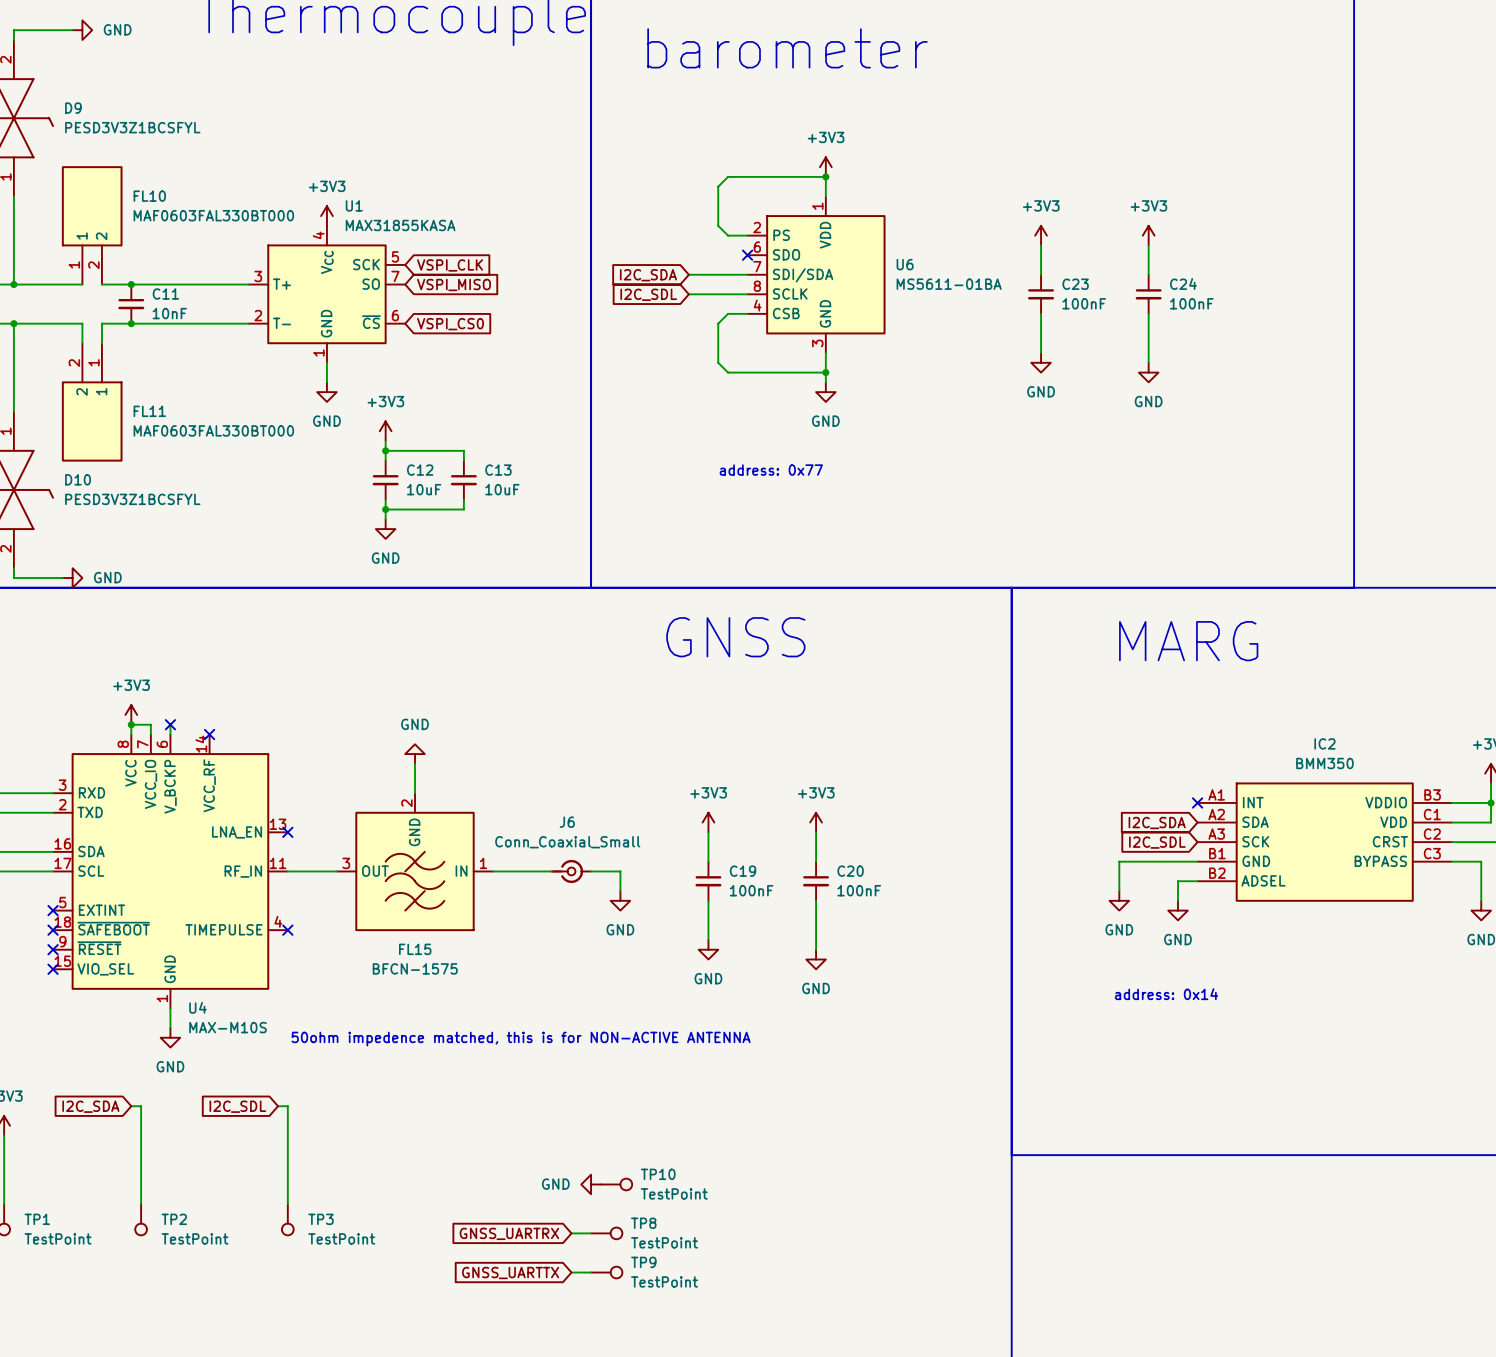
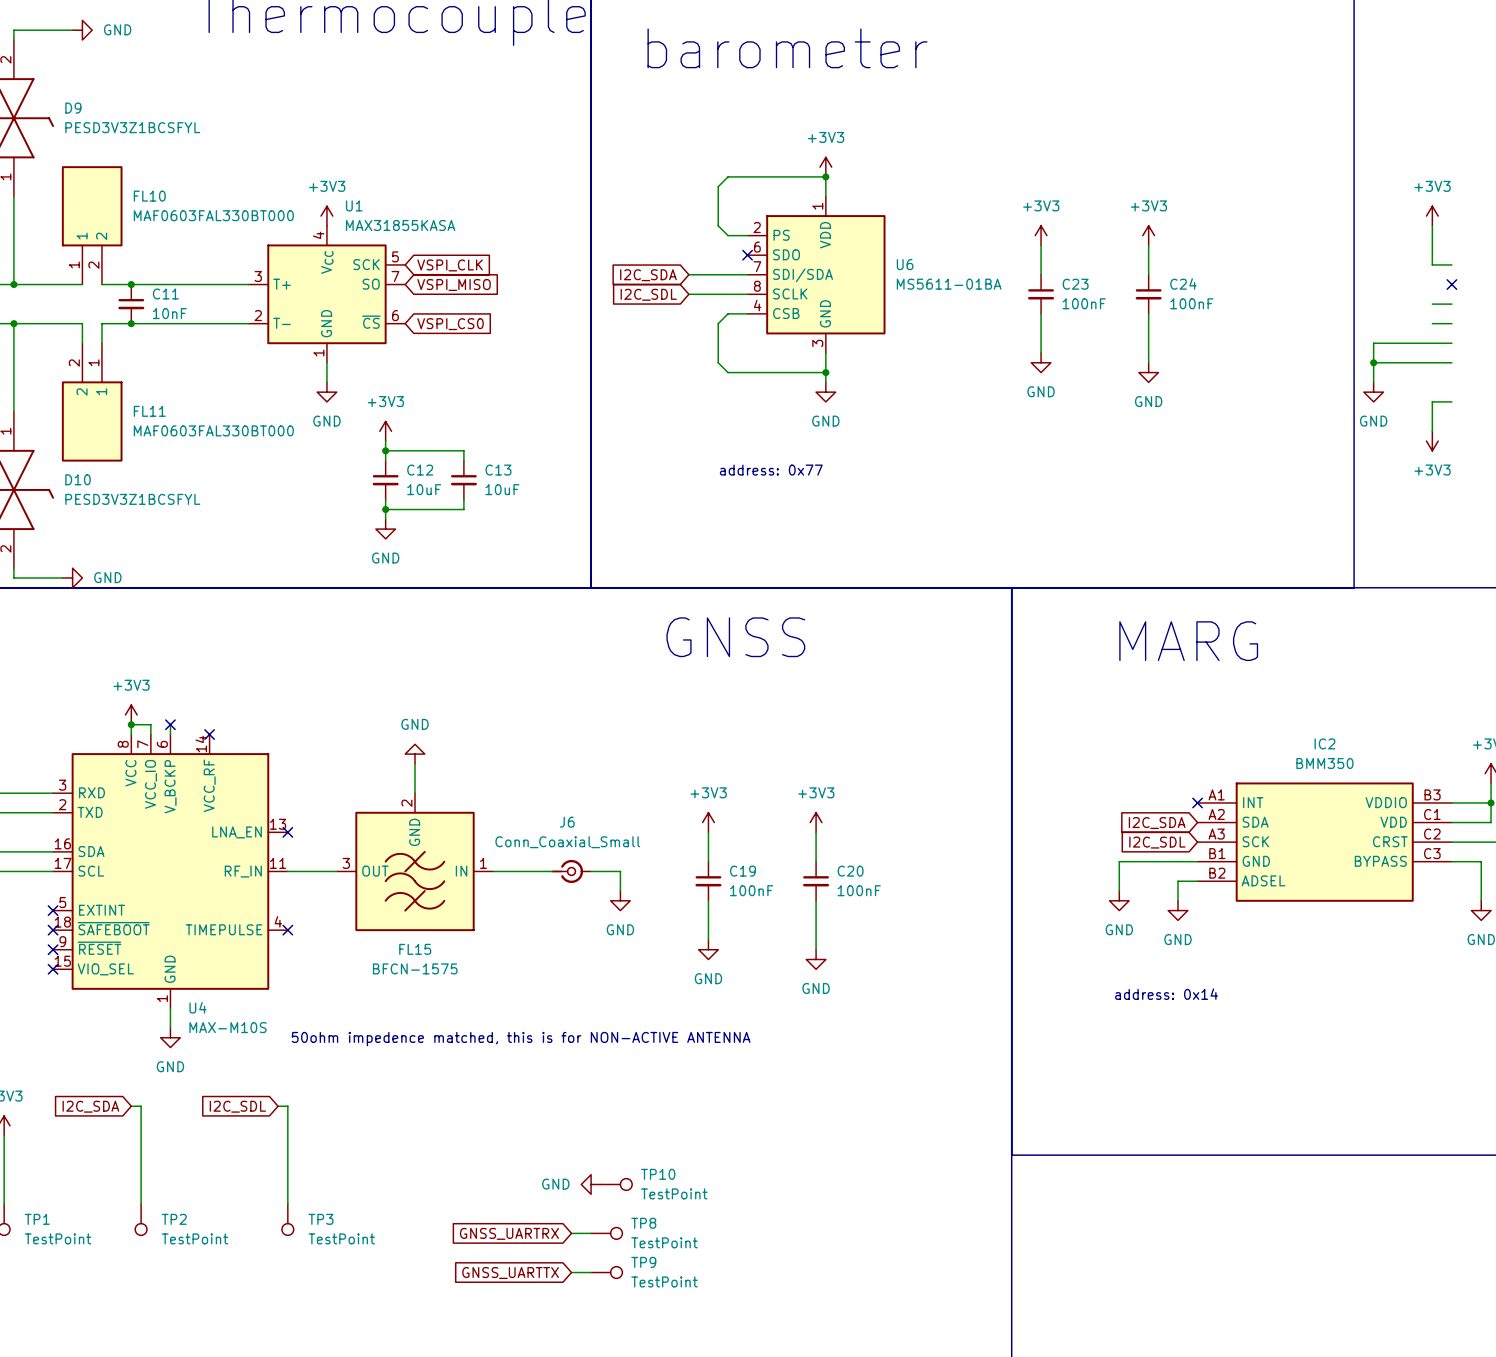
power symbol: none -> +3V3 (1432, 216)
wire: none -> (1432, 225) (1432, 264) (1451, 264)
no-connect mark: none -> (1451, 284)
wire: none -> (1432, 304) (1451, 304)
wire: none -> (1432, 323) (1451, 323)
wire: none -> (1451, 343) (1373, 343) (1373, 382)
wire: none -> (1373, 362) (1451, 362)
junction: none -> (1373, 362)
power symbol: none -> GND (1373, 392)
wire: none -> (1451, 401) (1432, 401) (1432, 431)
power symbol: none -> +3V3 (1432, 441)

